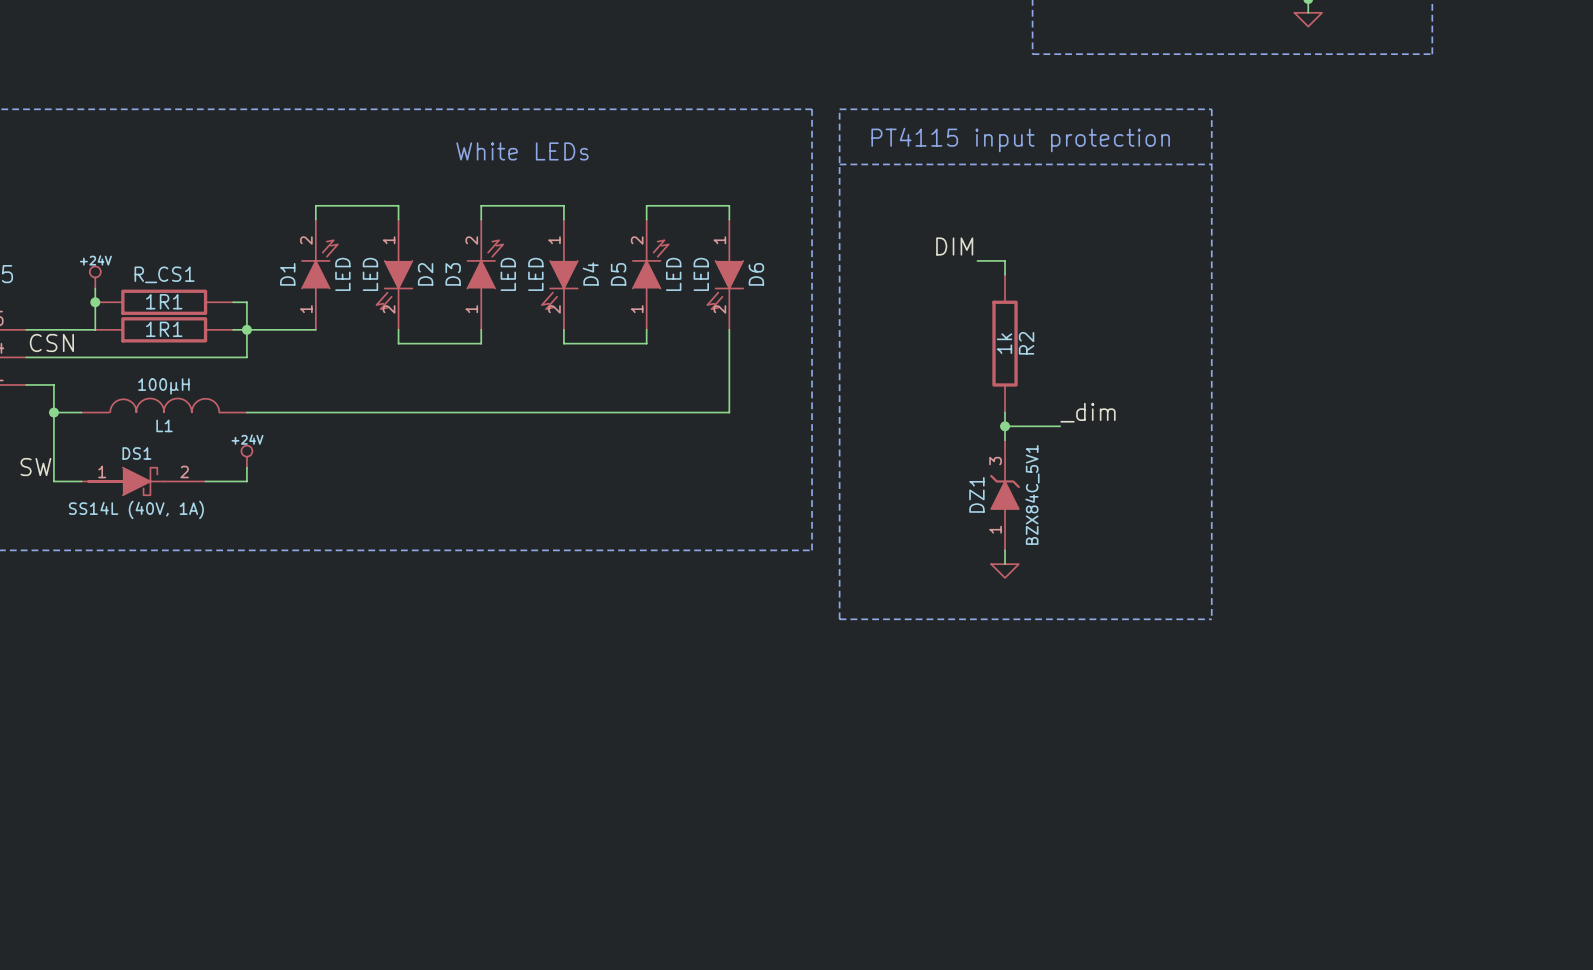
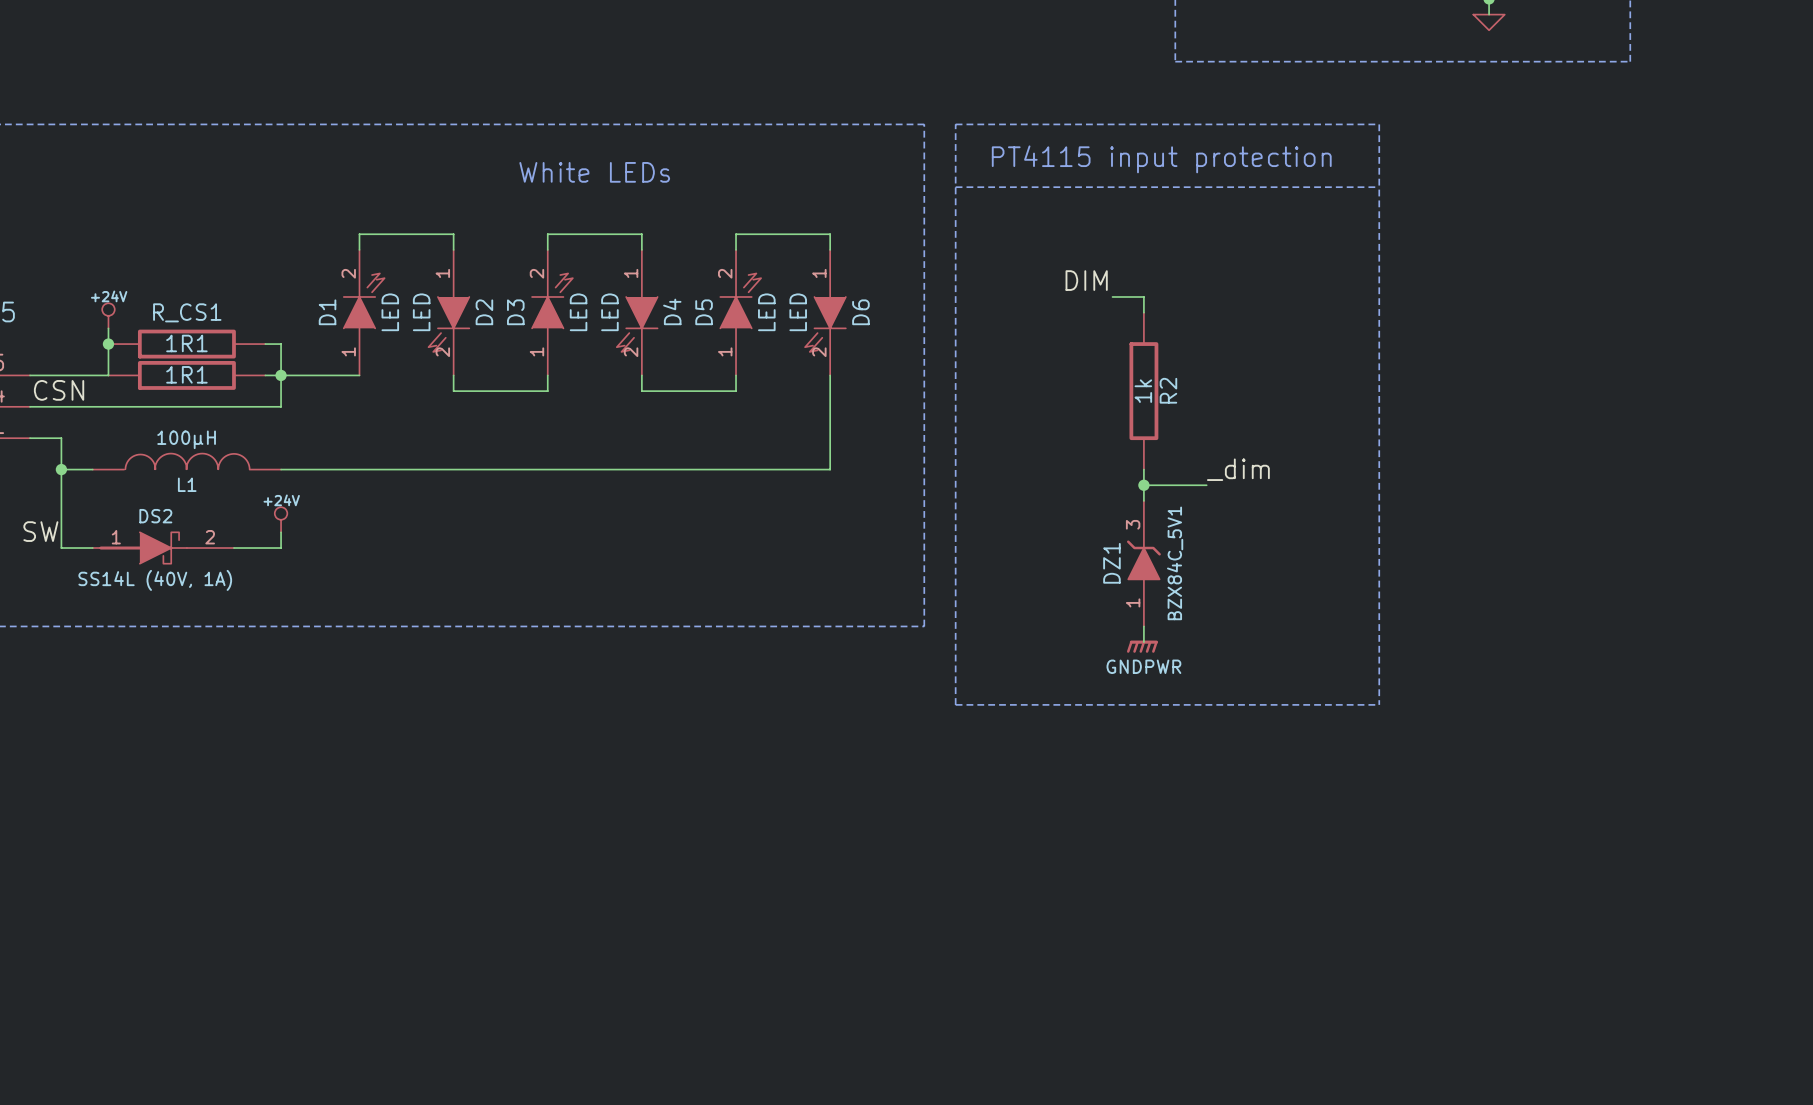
DS1 name: DS1 (136, 453) -> DS2 (155, 516)
power symbol shape: [991, 564, 1019, 578] -> [1126, 640, 1159, 653]
power symbol text: none -> GNDPWR (1143, 666)

